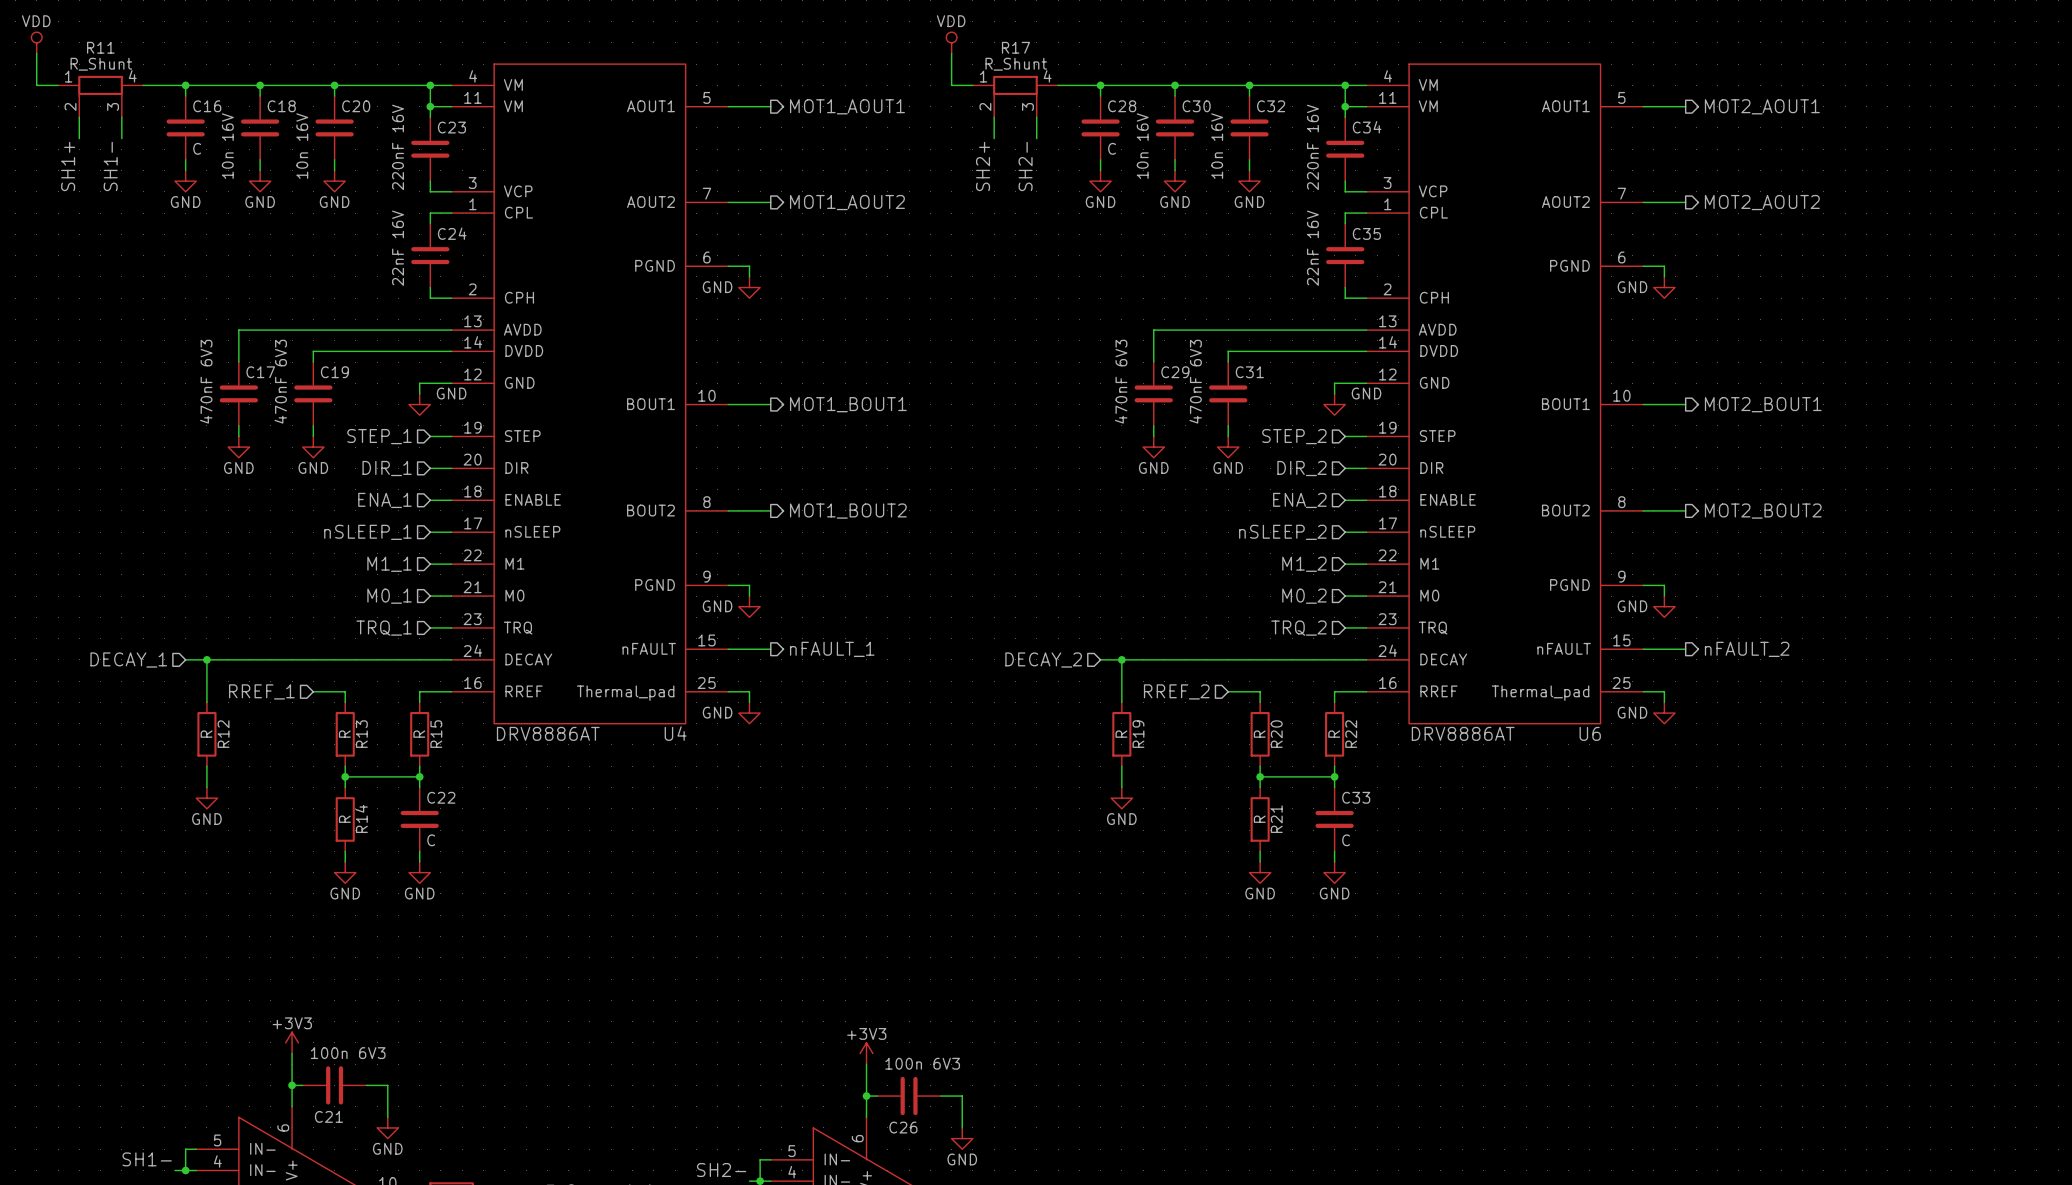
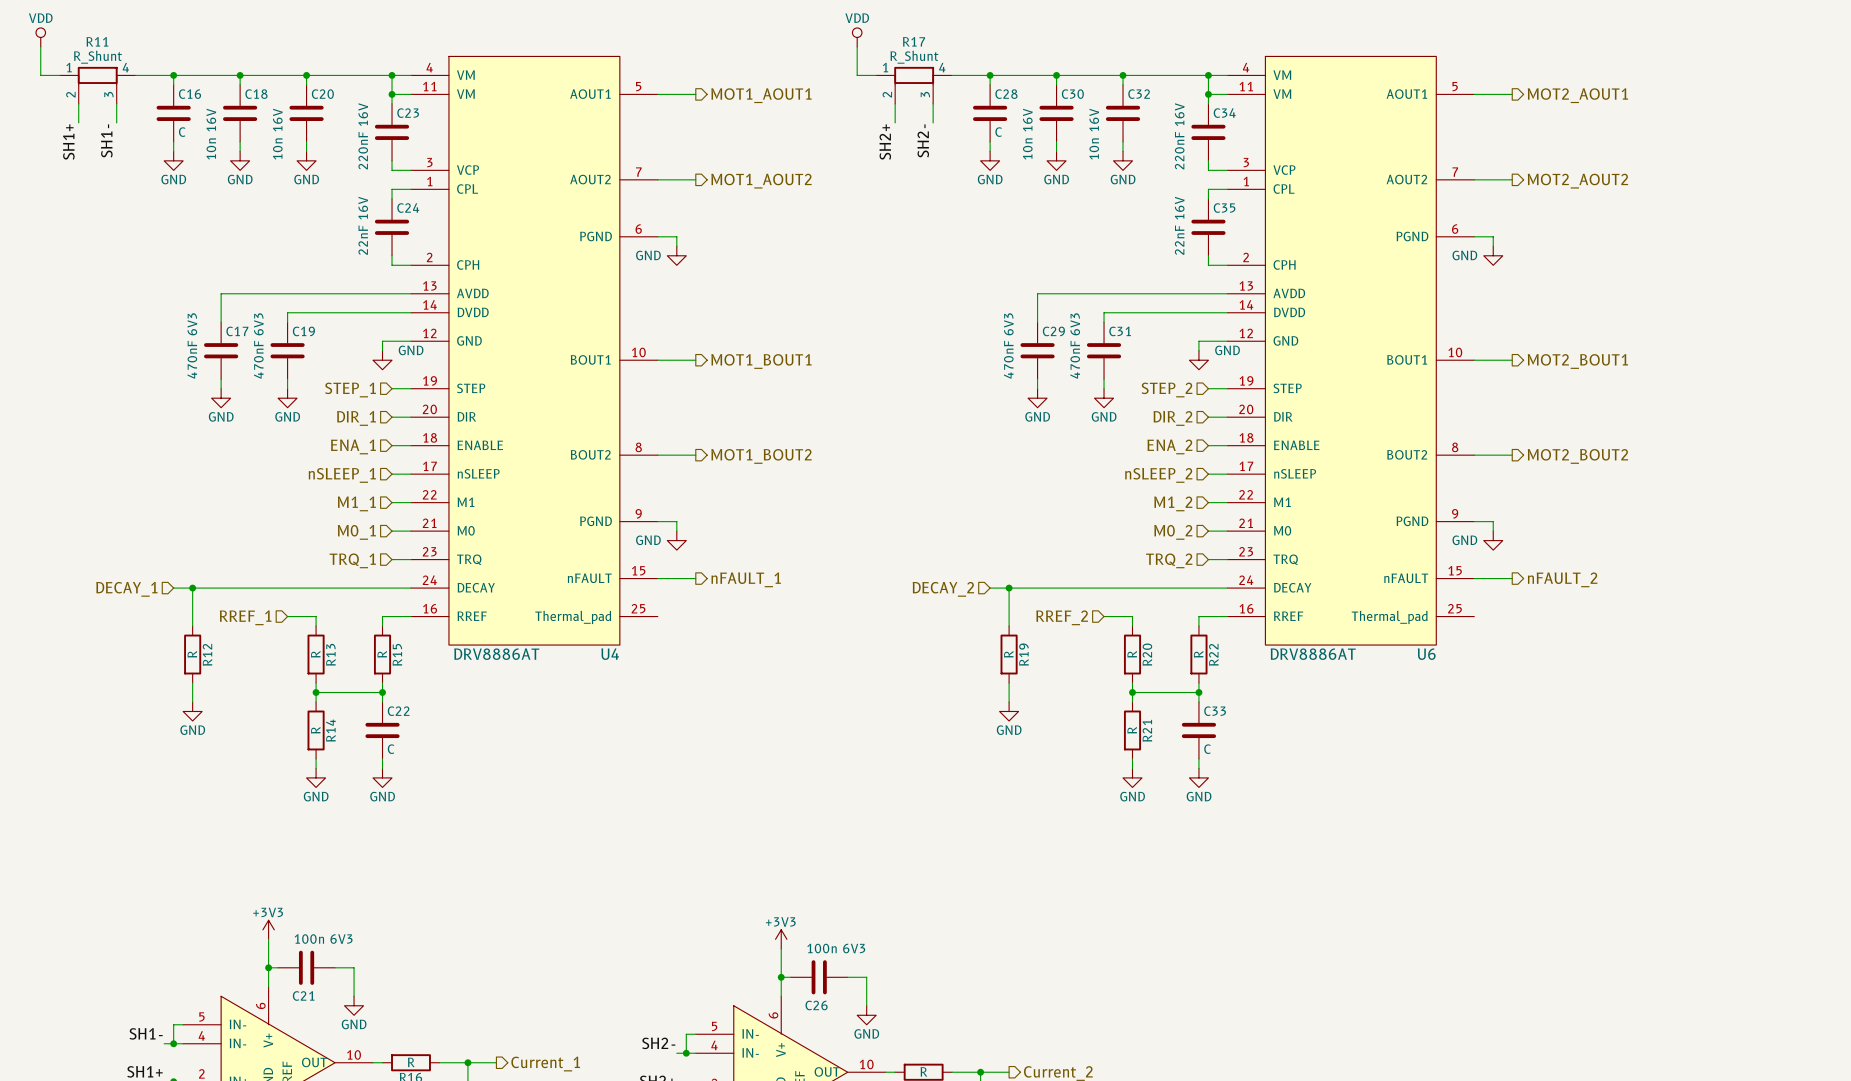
wire: (728, 691) (749, 691) (749, 702) -> none
wire: (1643, 691) (1664, 691) (1664, 702) -> none
power symbol: GND (749, 713) -> none
power symbol: GND (1664, 713) -> none

